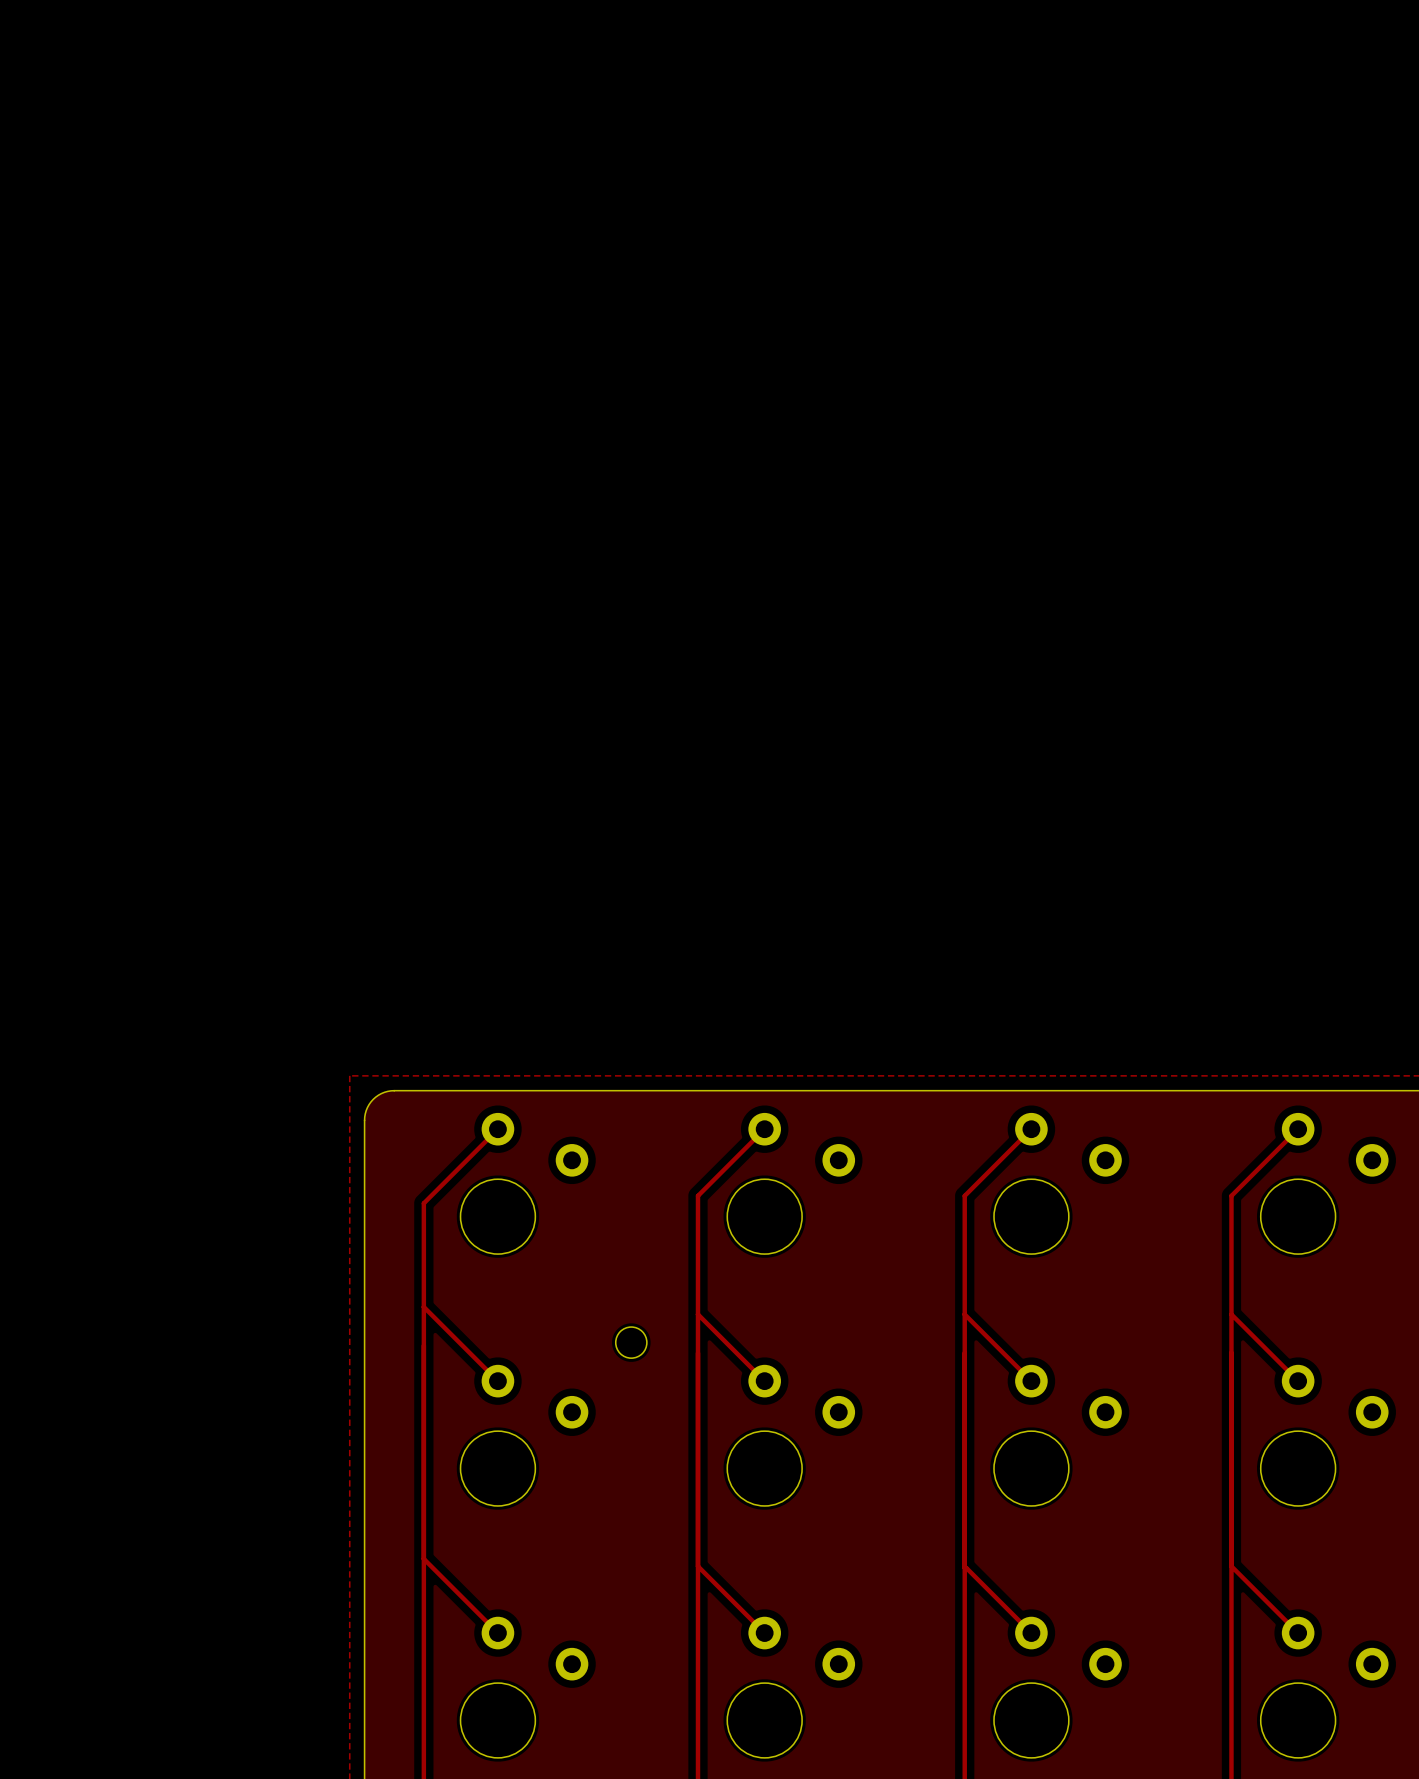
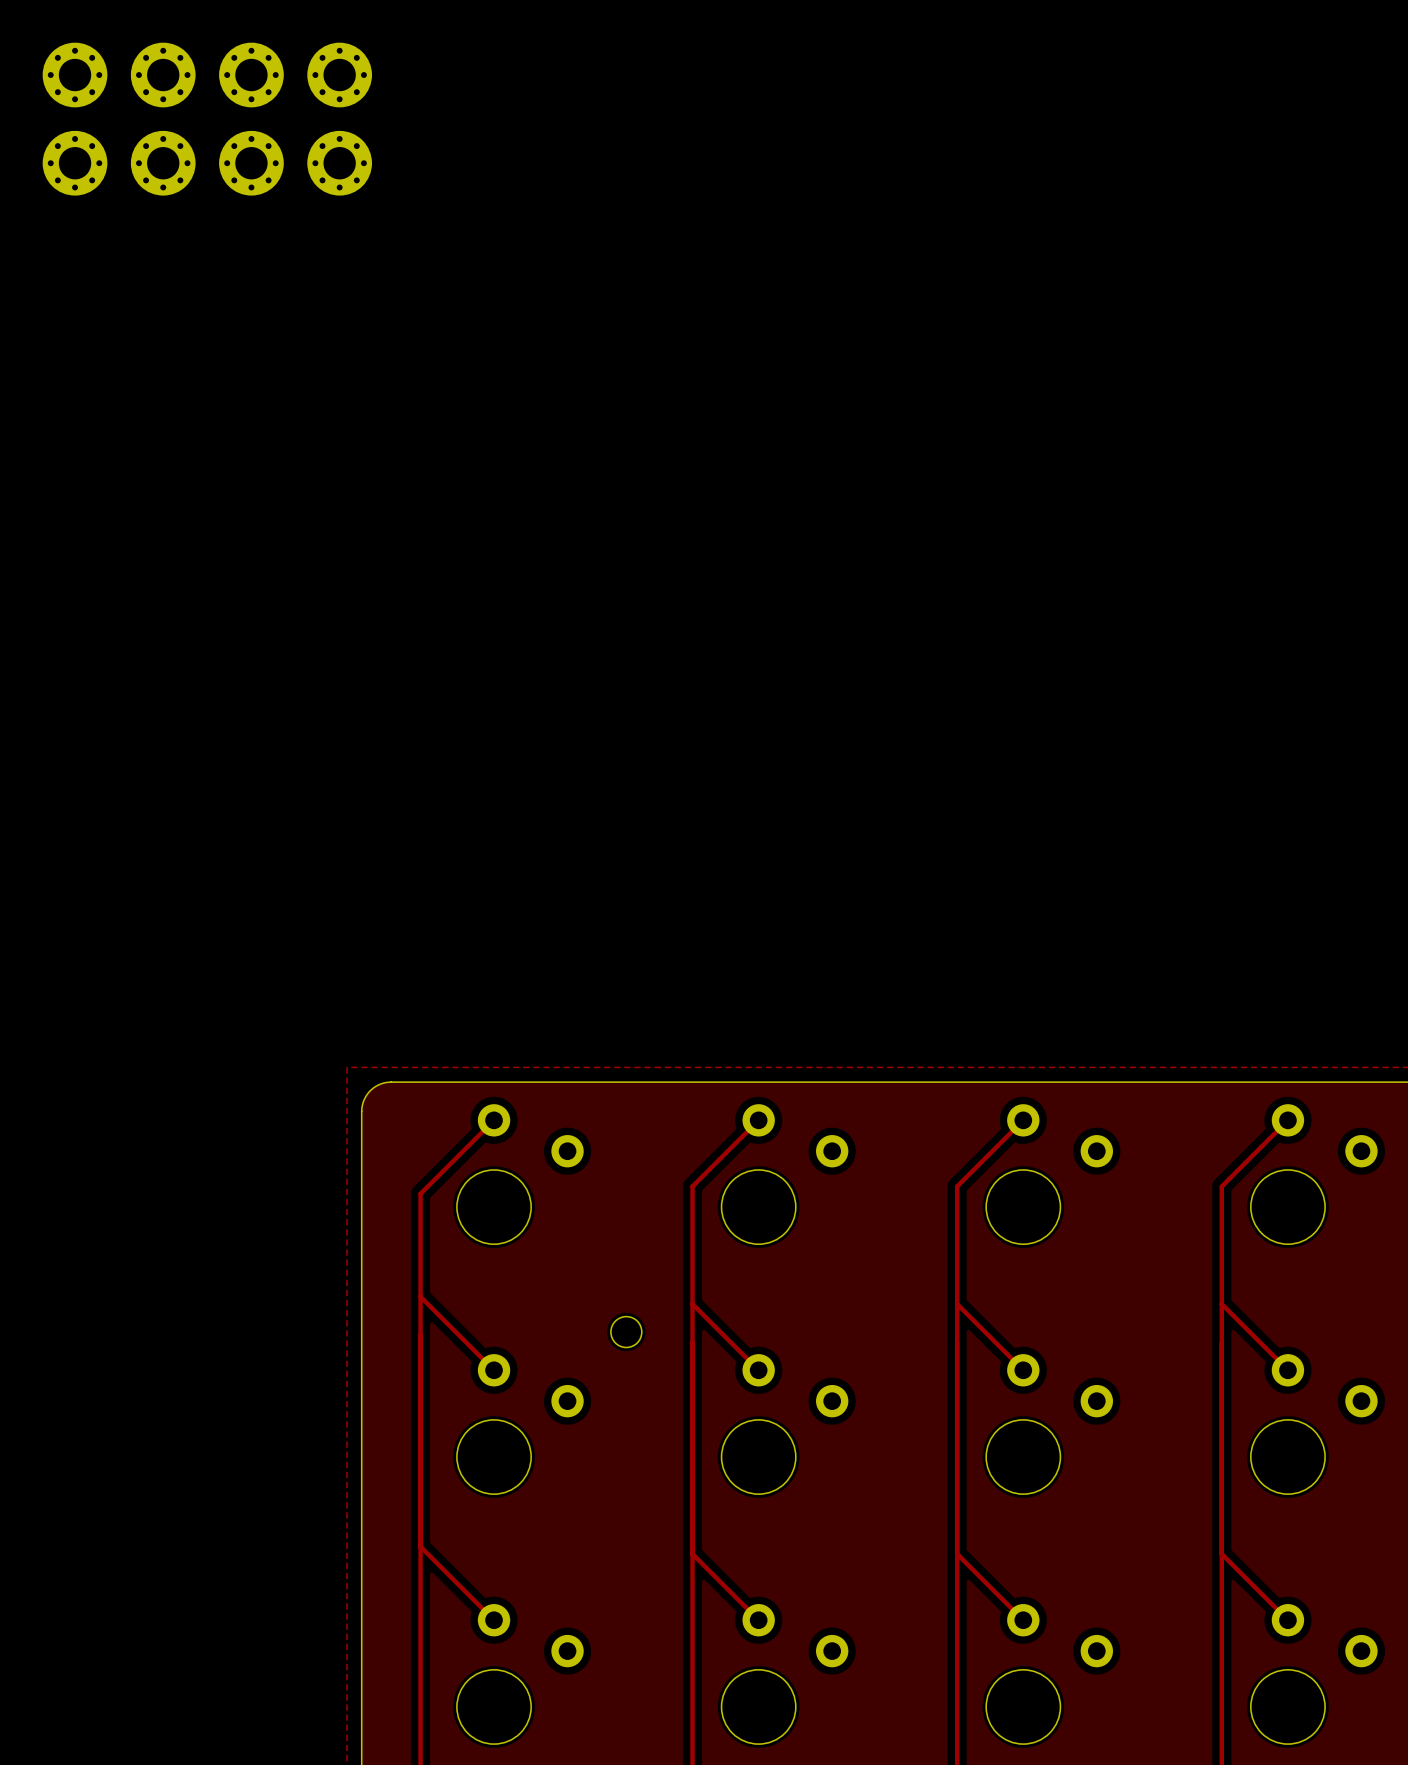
part: none -> (75, 75)
part: none -> (163, 75)
part: none -> (251, 75)
part: none -> (339, 75)
part: none -> (75, 163)
part: none -> (163, 163)
part: none -> (251, 163)
part: none -> (339, 163)

